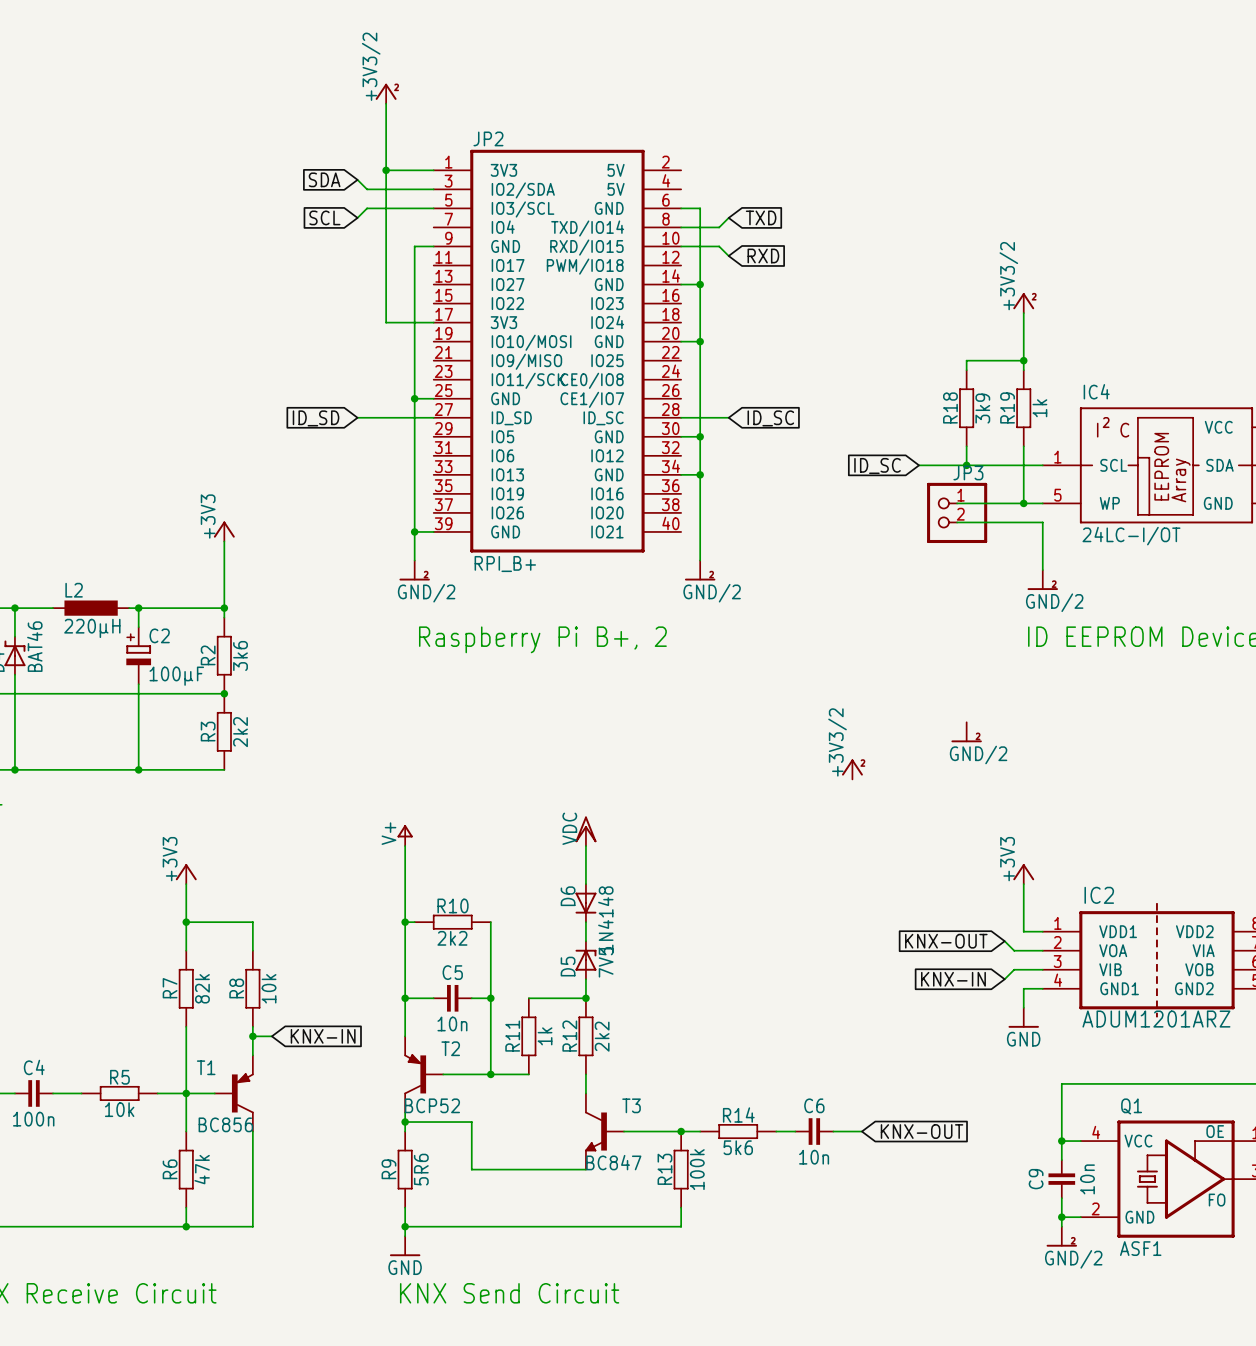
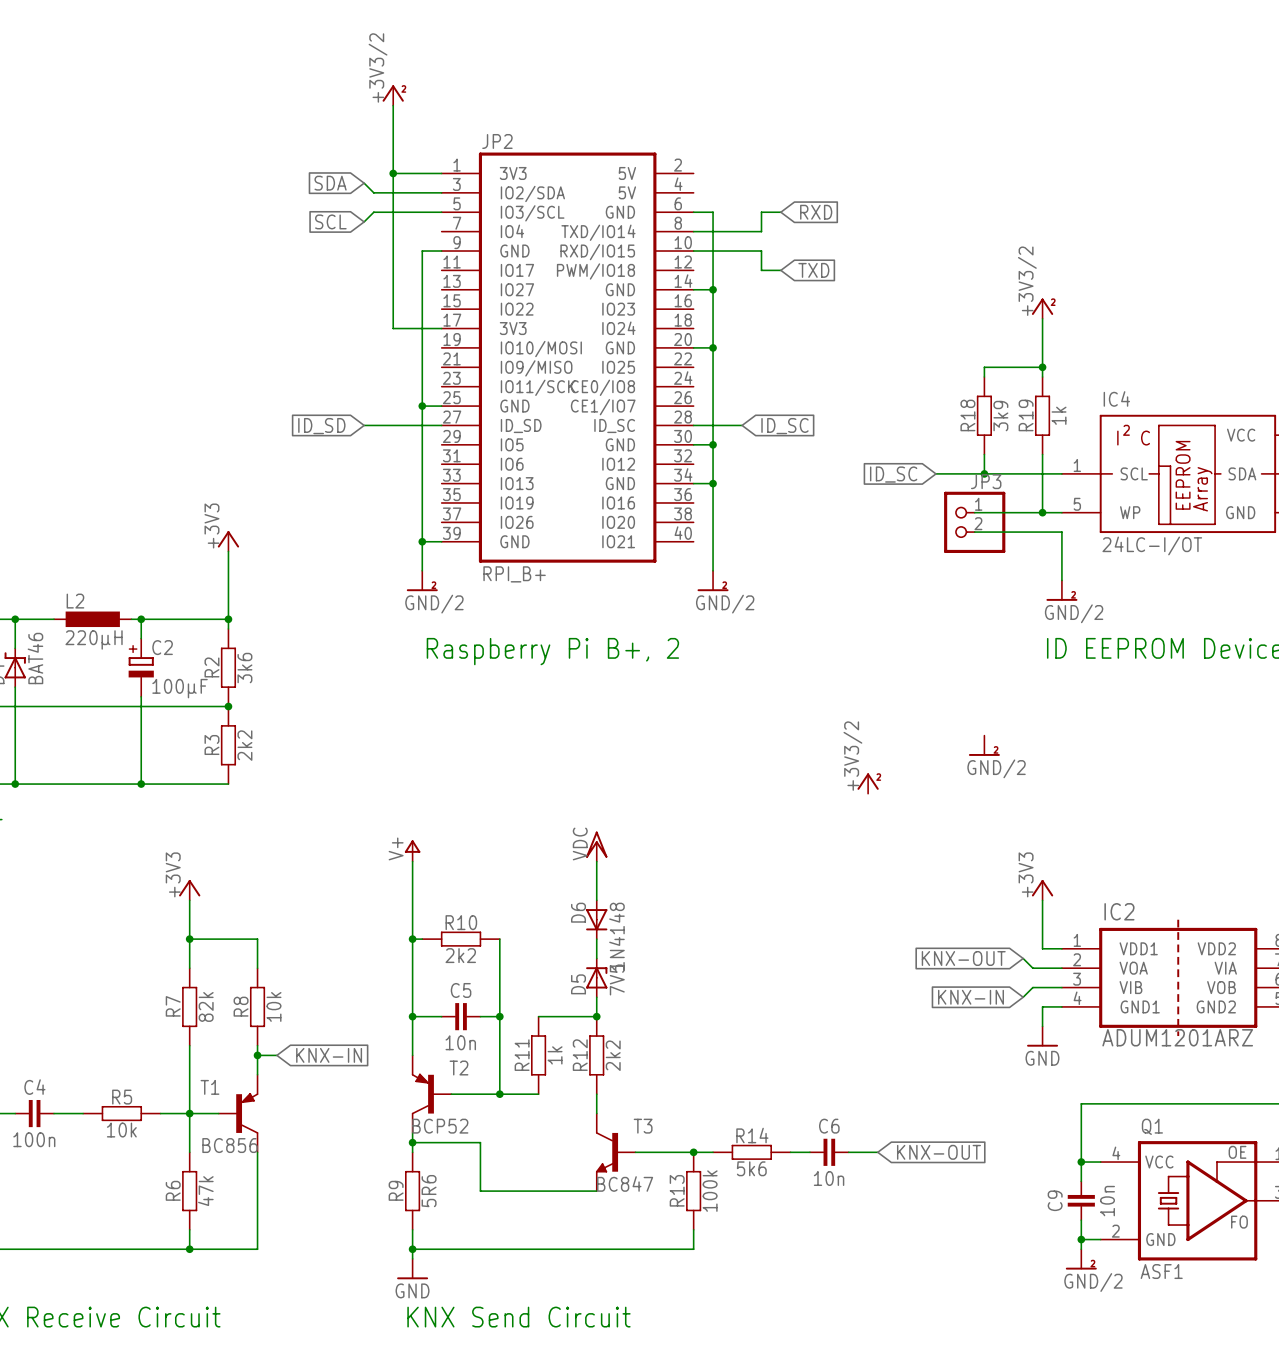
wire: (728, 217) (719, 227) -> (780, 212) (761, 212) (761, 231) (732, 231)
global label position: TXD (761, 217) -> TXD (813, 270)
wire: (719, 246) (728, 255) -> (732, 251) (761, 251) (761, 270) (780, 270)
global label position: RXD (763, 255) -> RXD (816, 212)

